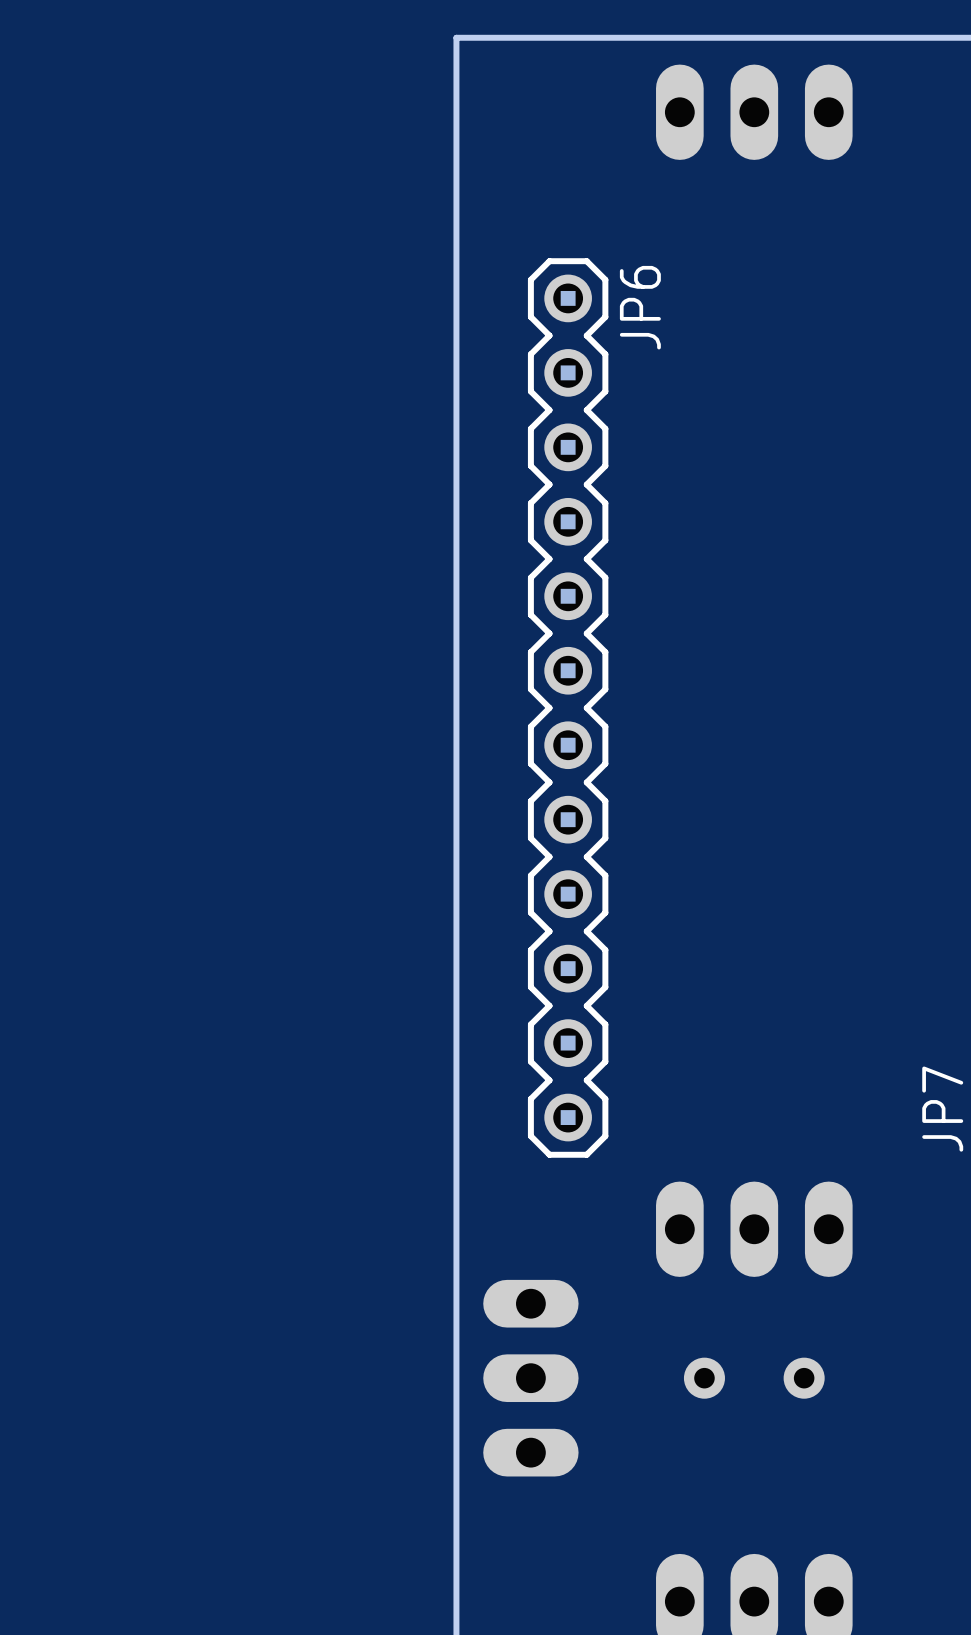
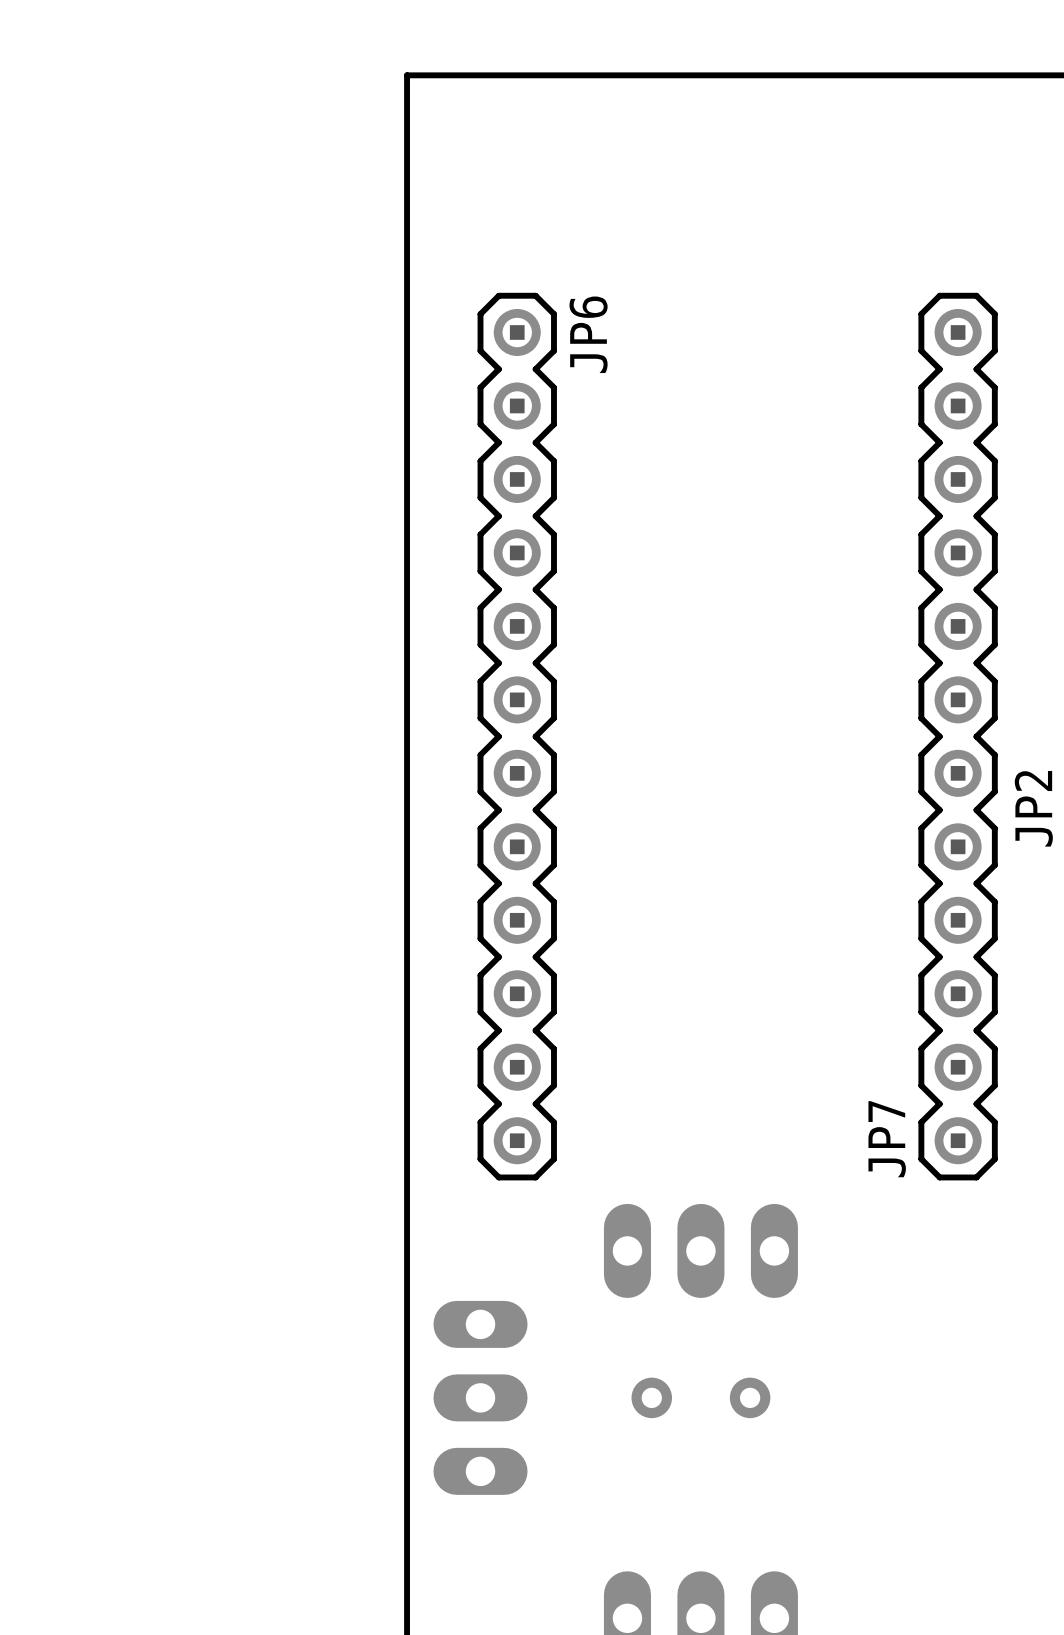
part: (754, 112) -> none

